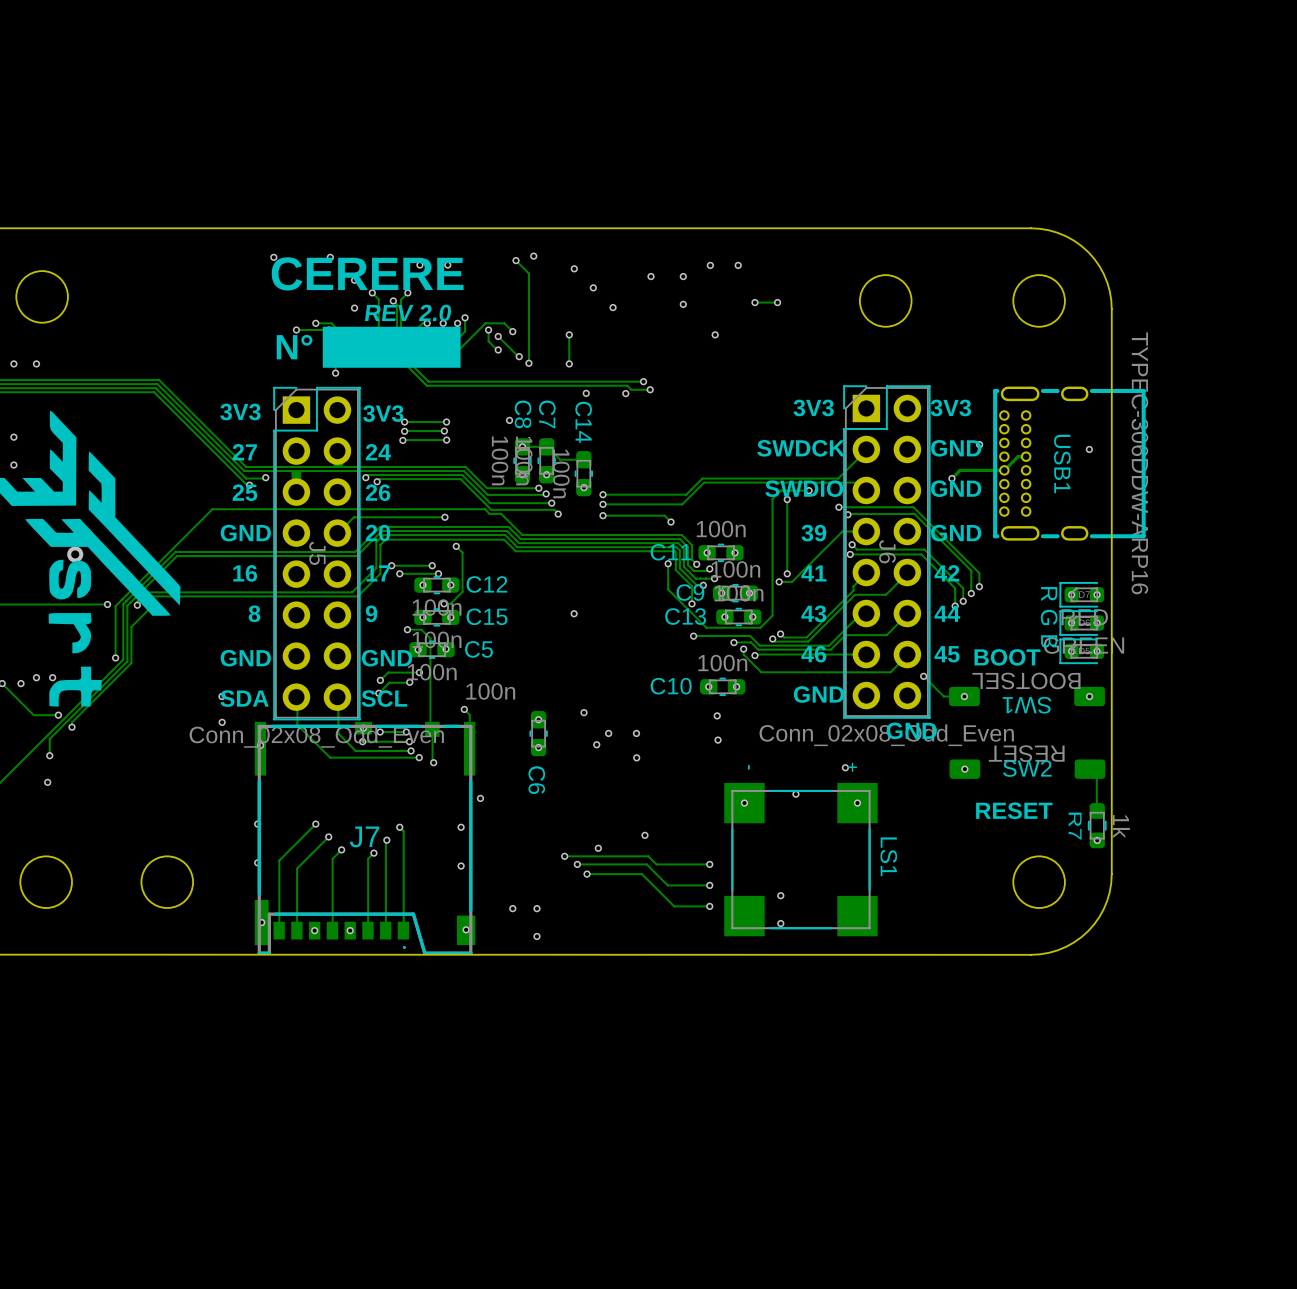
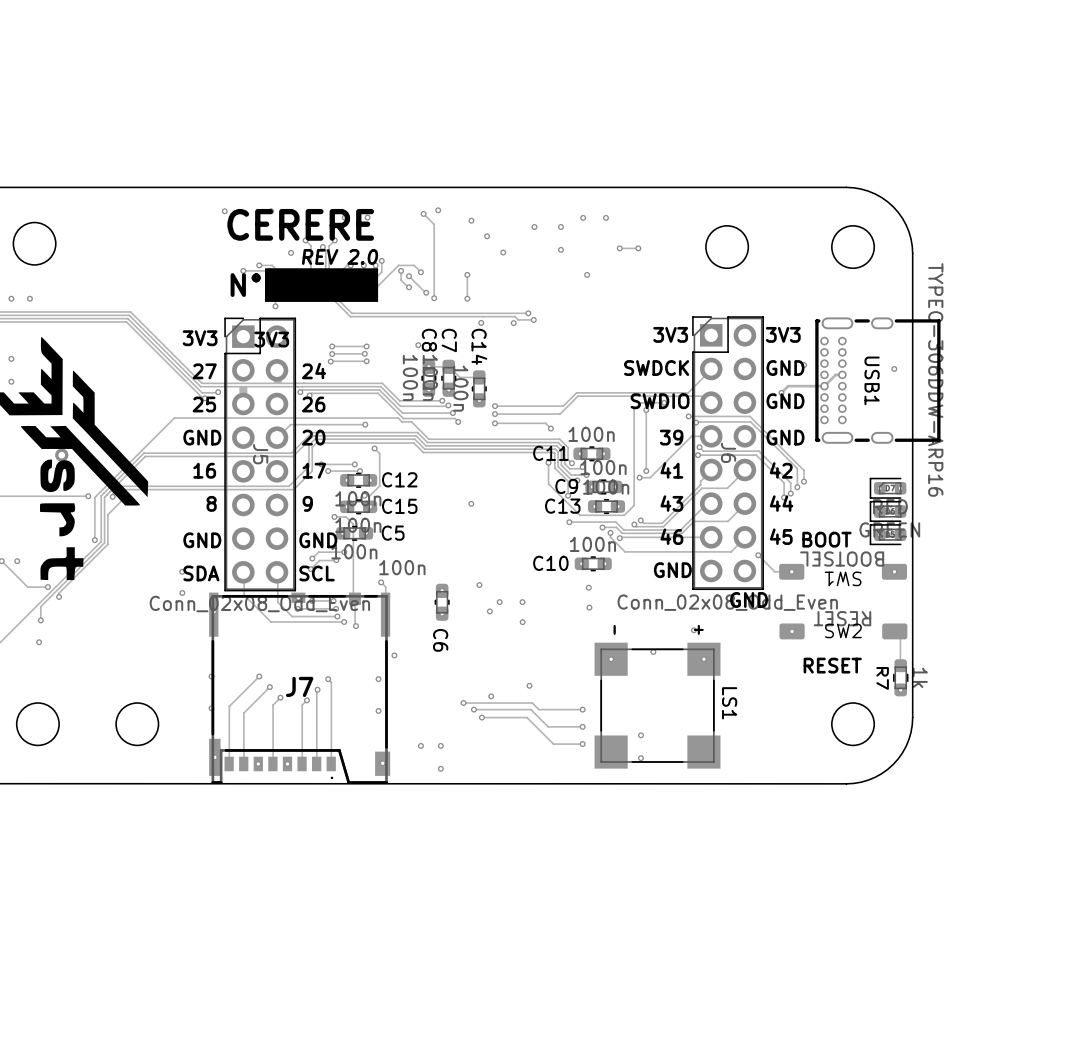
text position: 3V3 (383, 413) -> 3V3 (271, 339)
text: R G B (1049, 617) -> none
via: (36, 677) -> none
via: (52, 677) -> none

